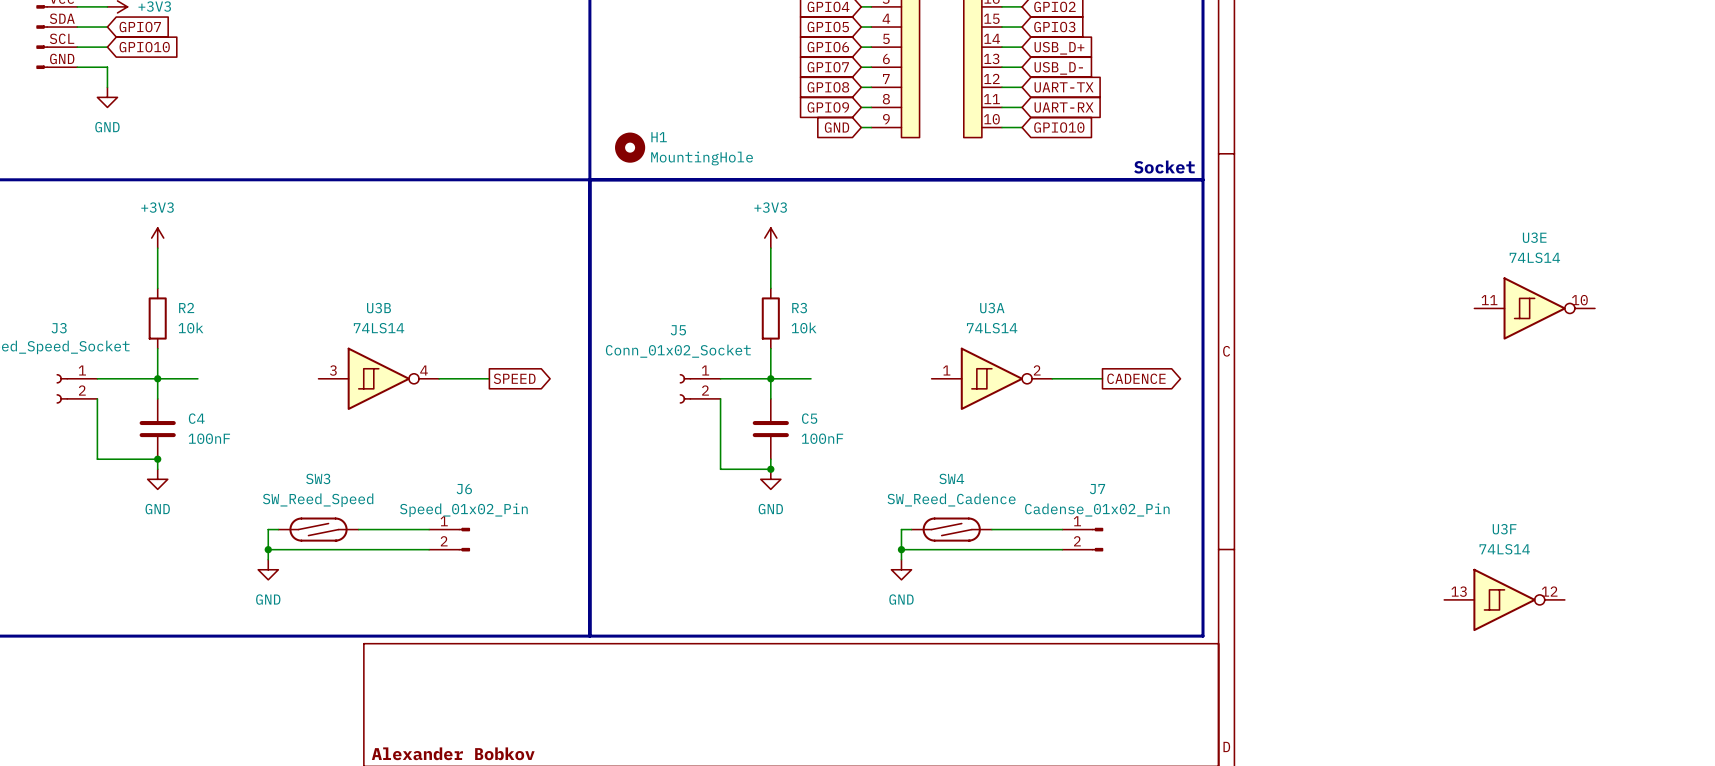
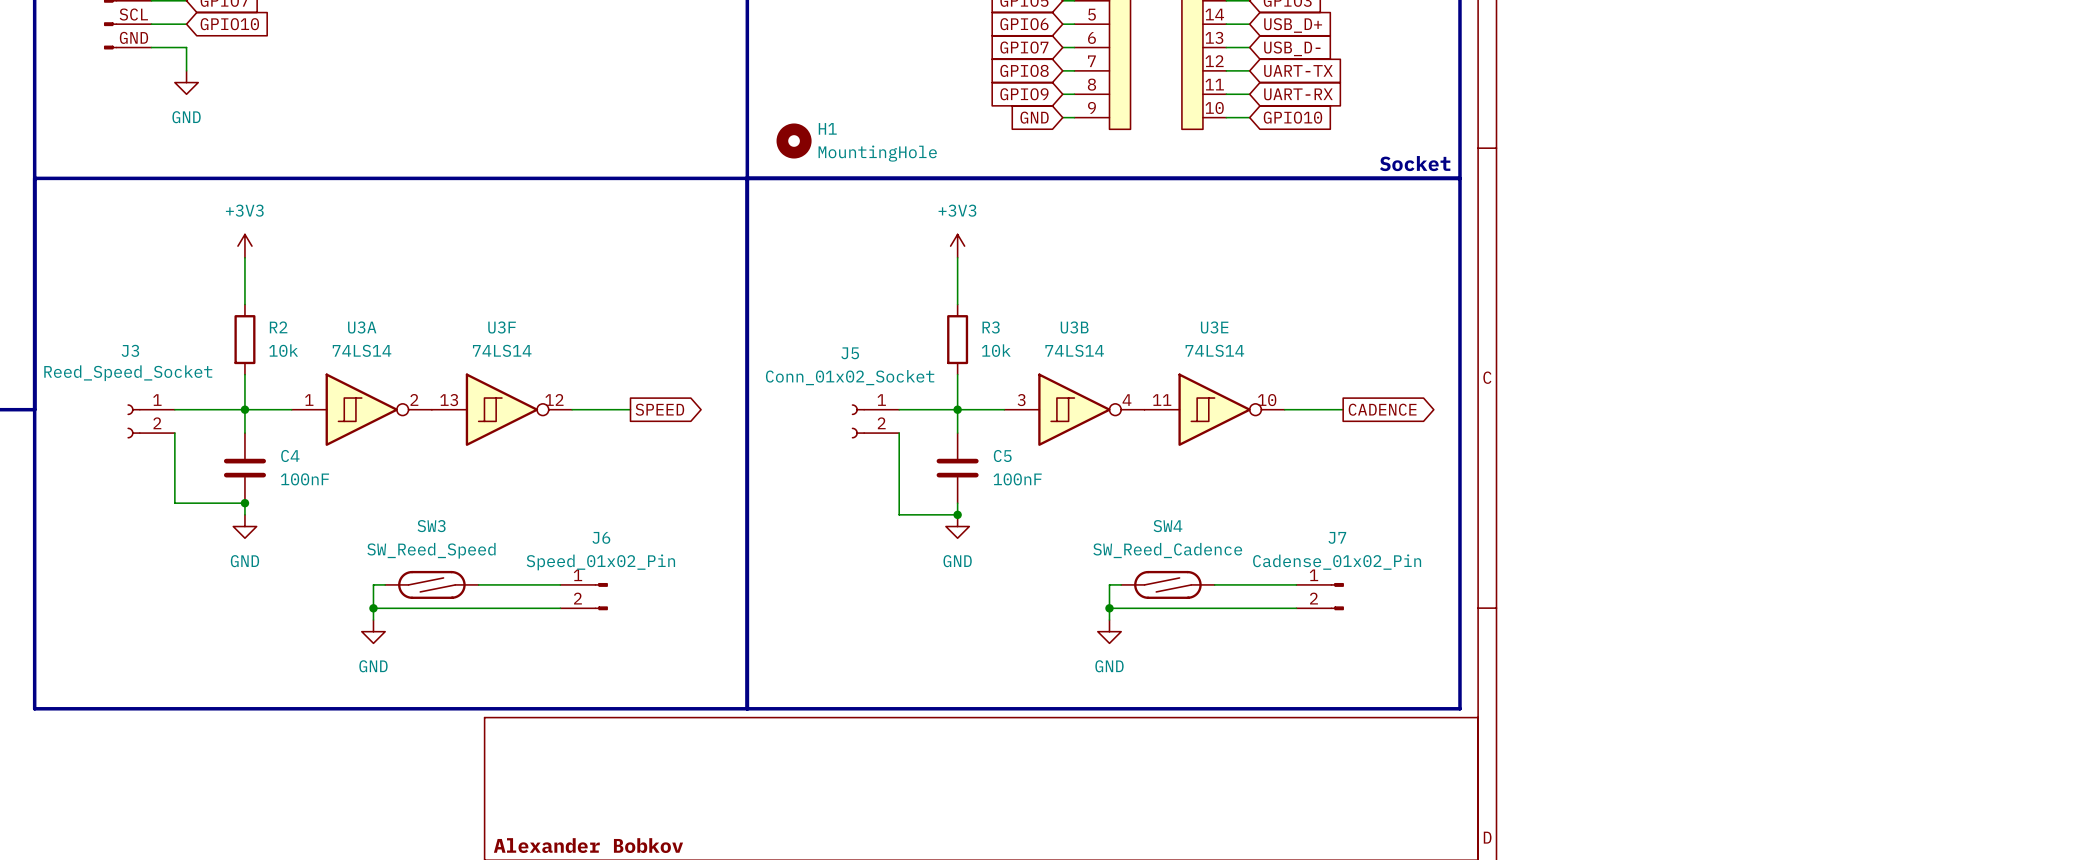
U3E position: (1534, 308) -> (1214, 409)
U3B position: (378, 378) -> (1074, 409)
U3A position: (991, 378) -> (361, 409)
U3F position: (1504, 599) -> (501, 409)

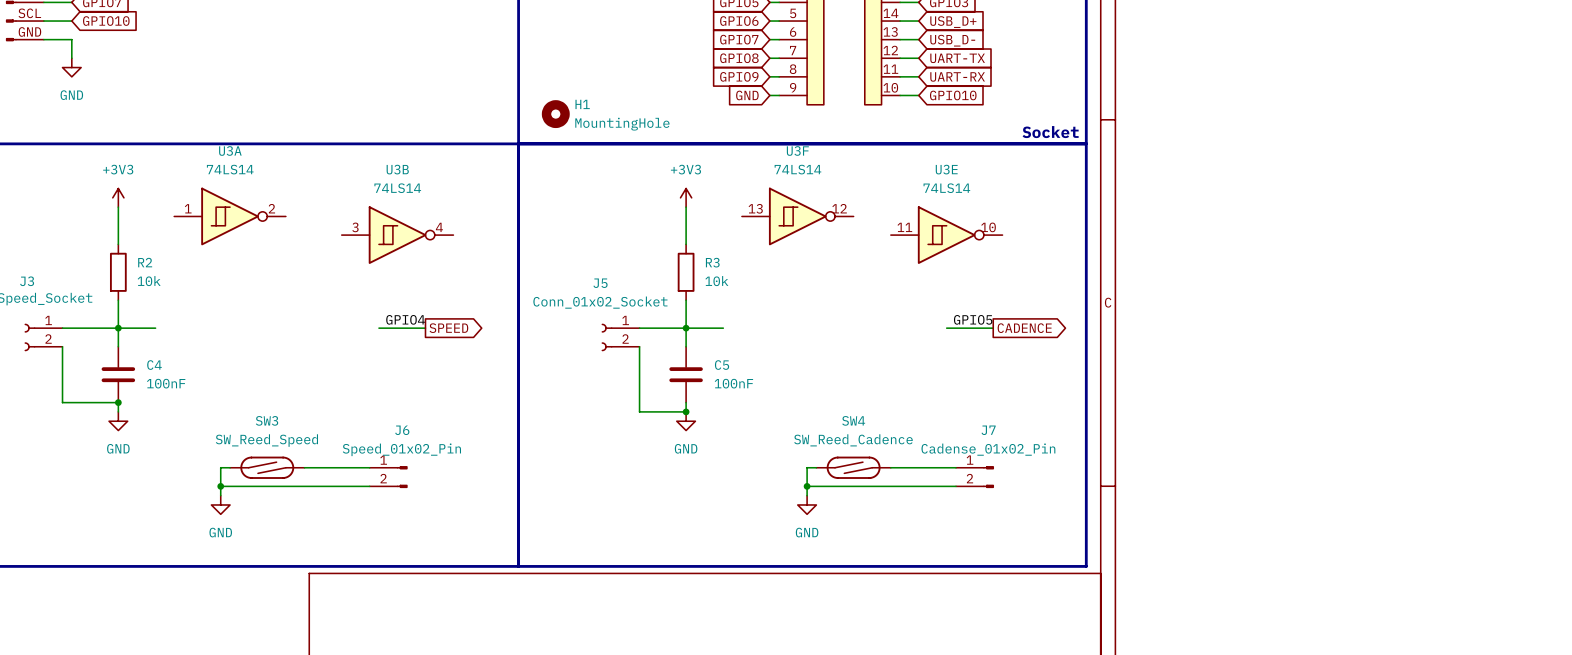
label: none -> GPIO4 (405, 319)
label: none -> GPIO5 (973, 319)
U3A position: (361, 409) -> (230, 216)
U3F position: (501, 409) -> (797, 216)
U3B position: (1074, 409) -> (397, 235)
U3E position: (1214, 409) -> (946, 235)

